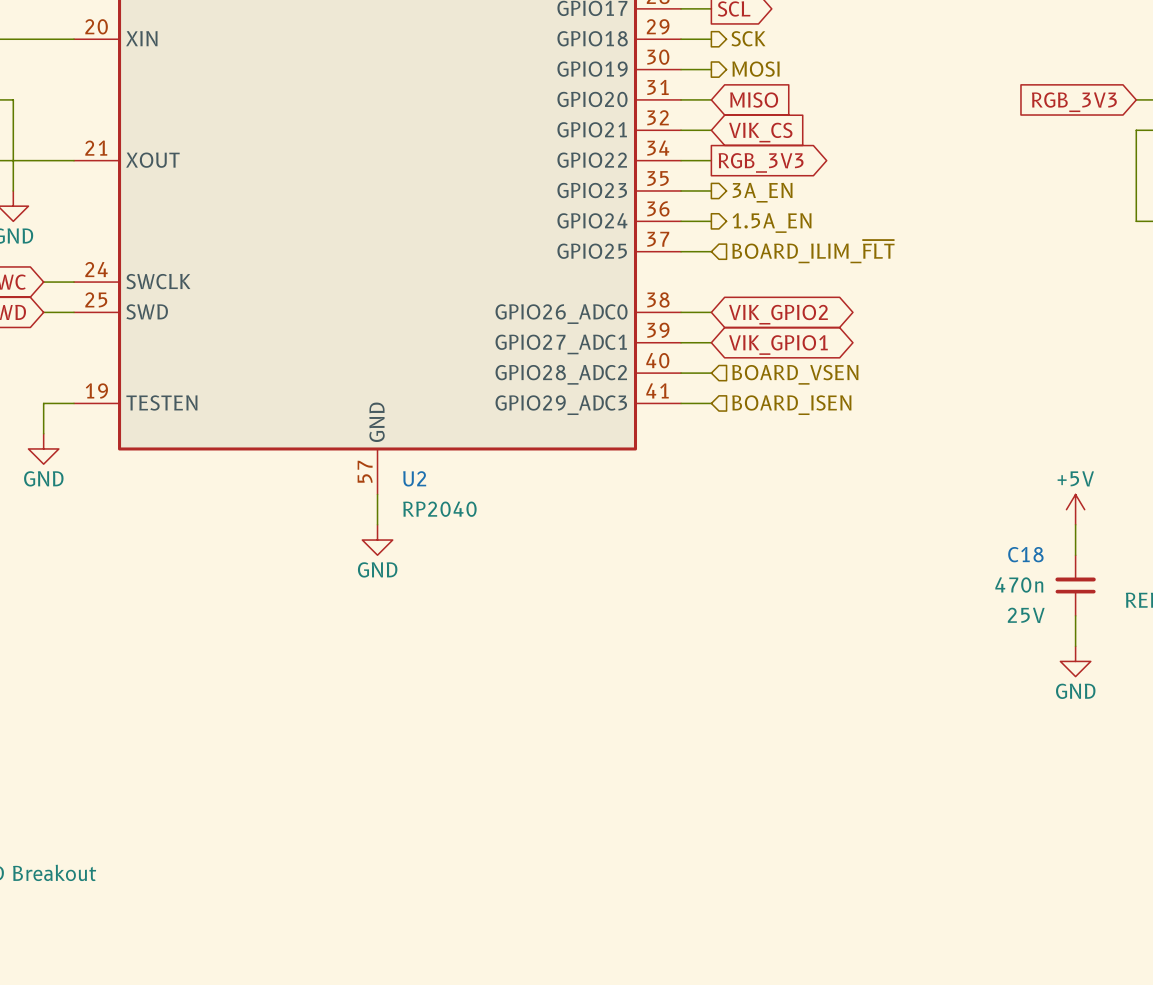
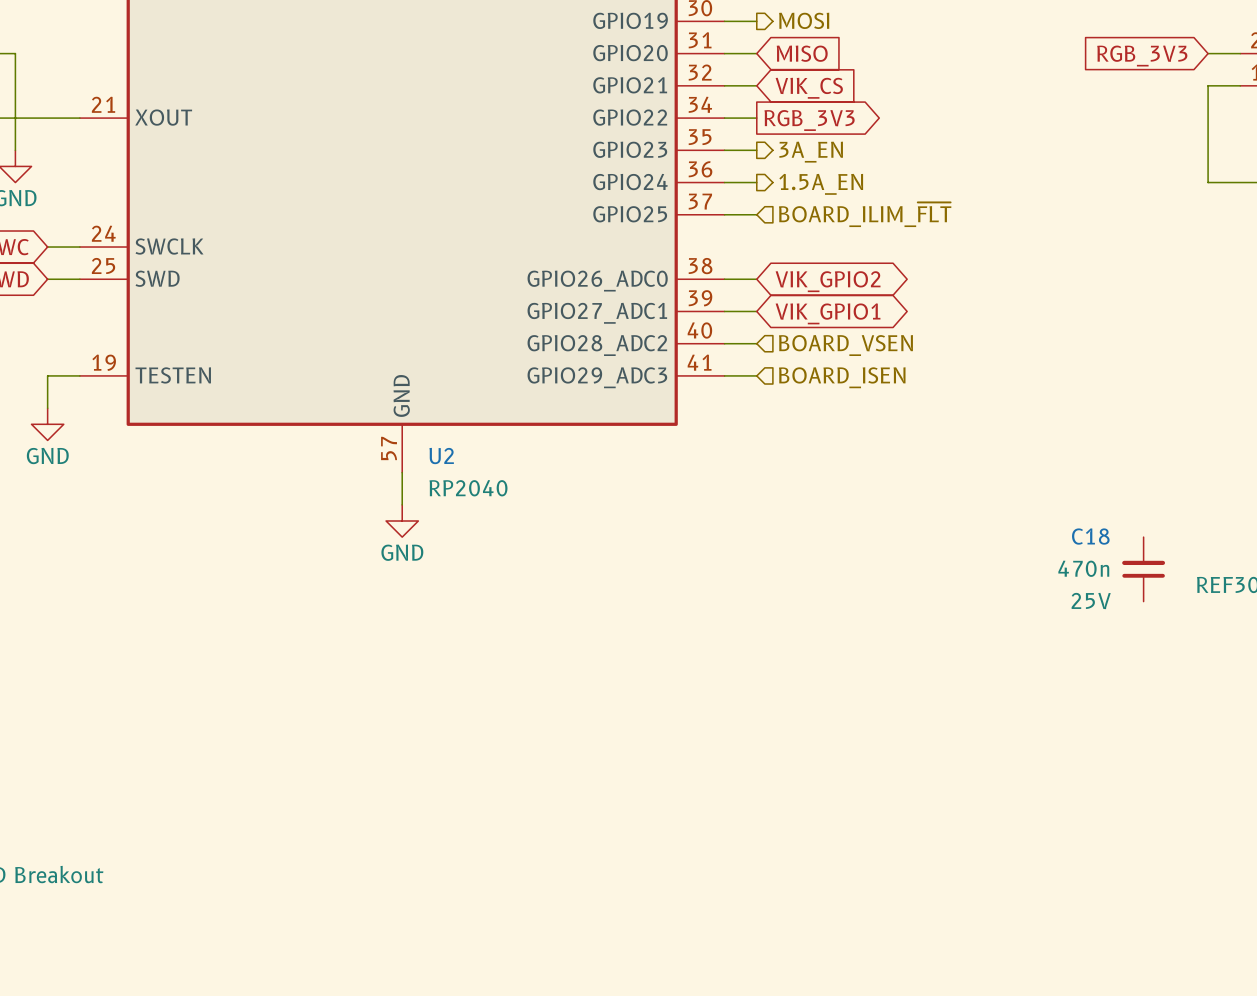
power symbol: +5V (1075, 509) -> none
wire: (1075, 524) (1075, 555) -> none
wire: (1075, 615) (1075, 646) -> none
power symbol: GND (1075, 661) -> none

